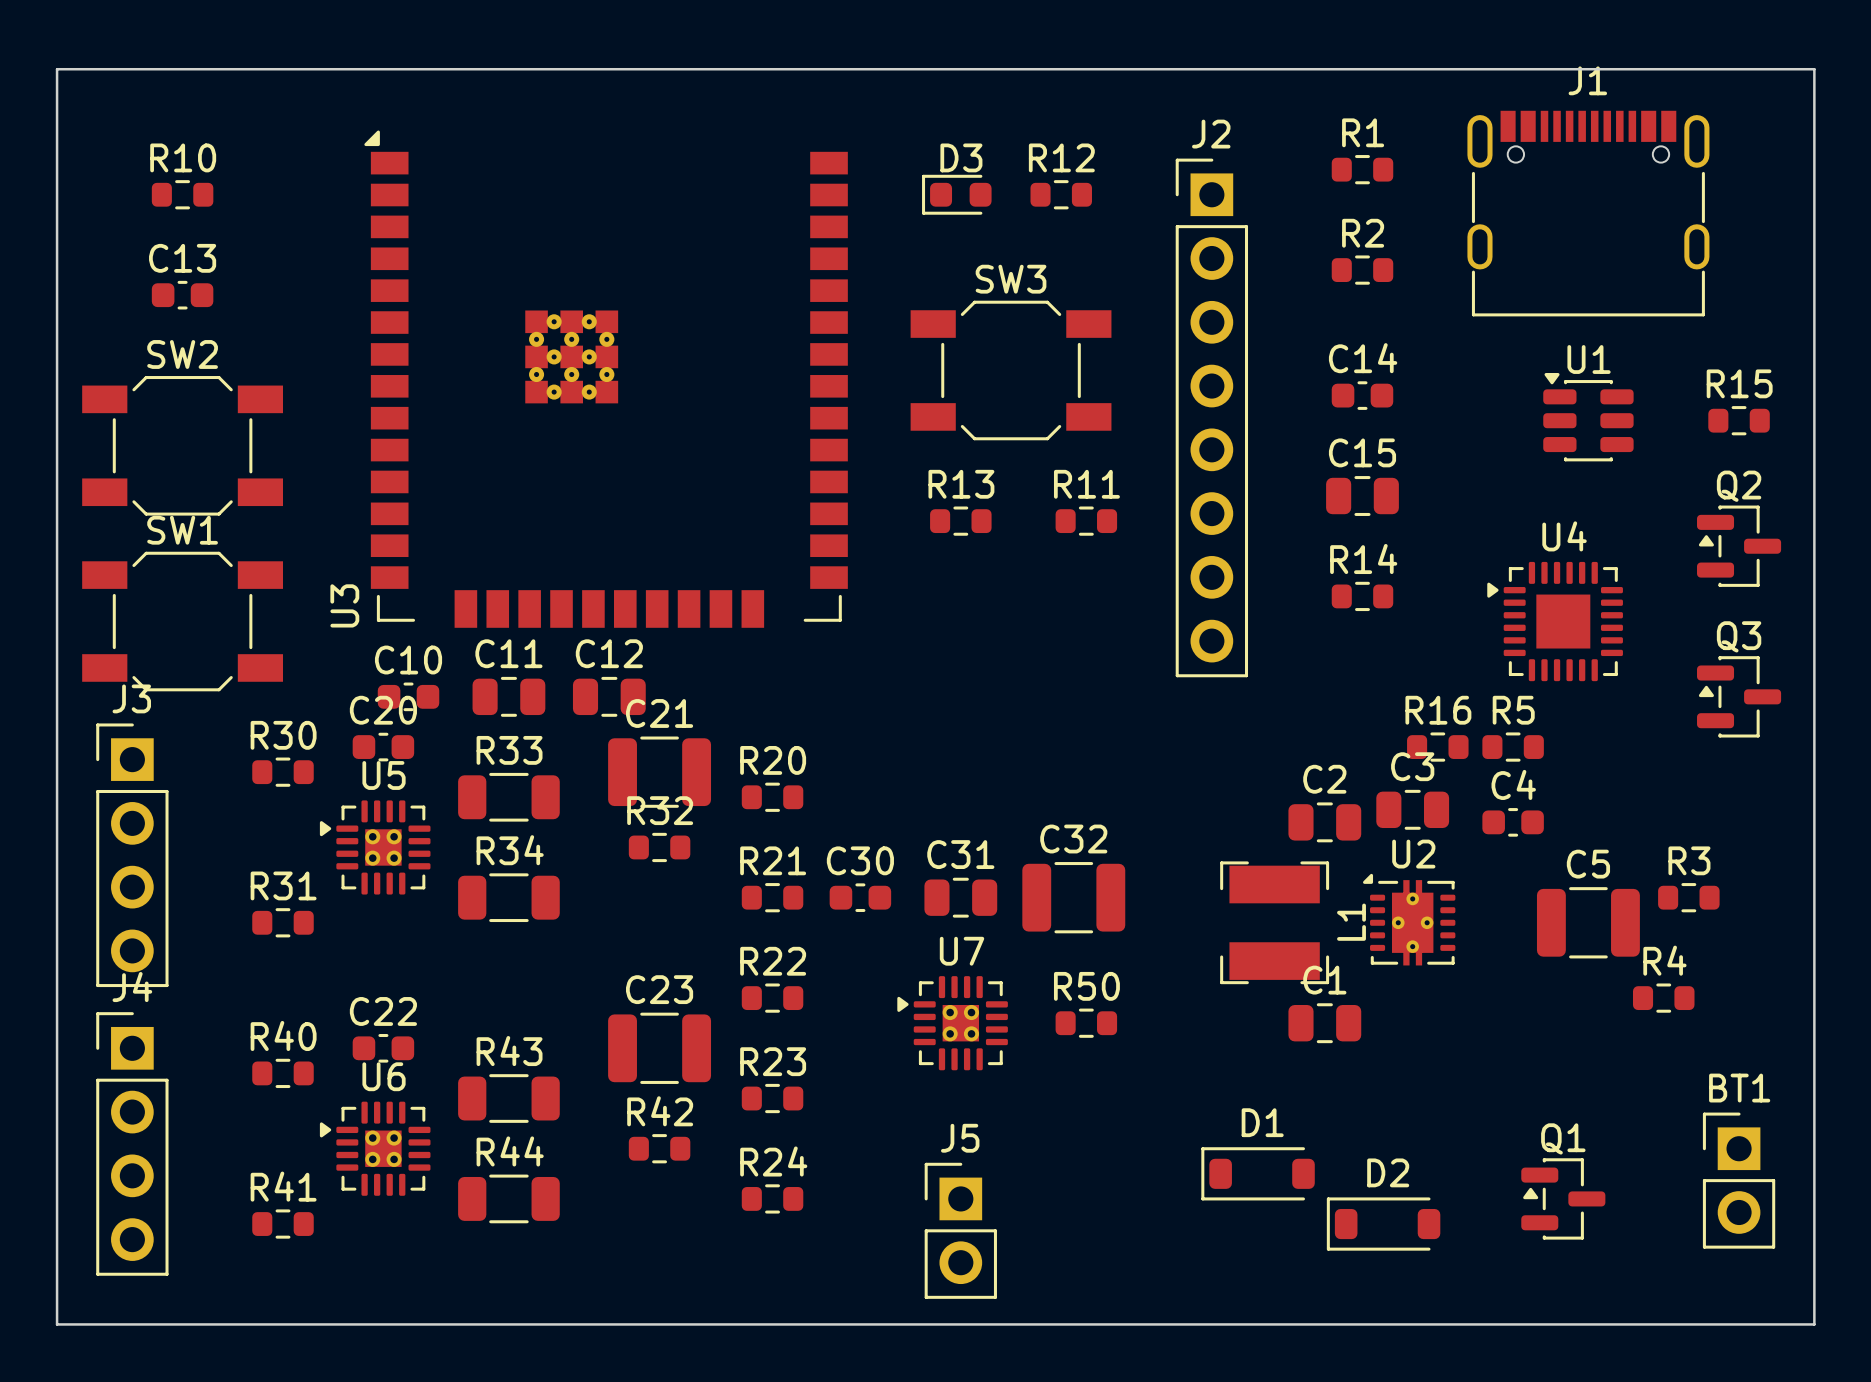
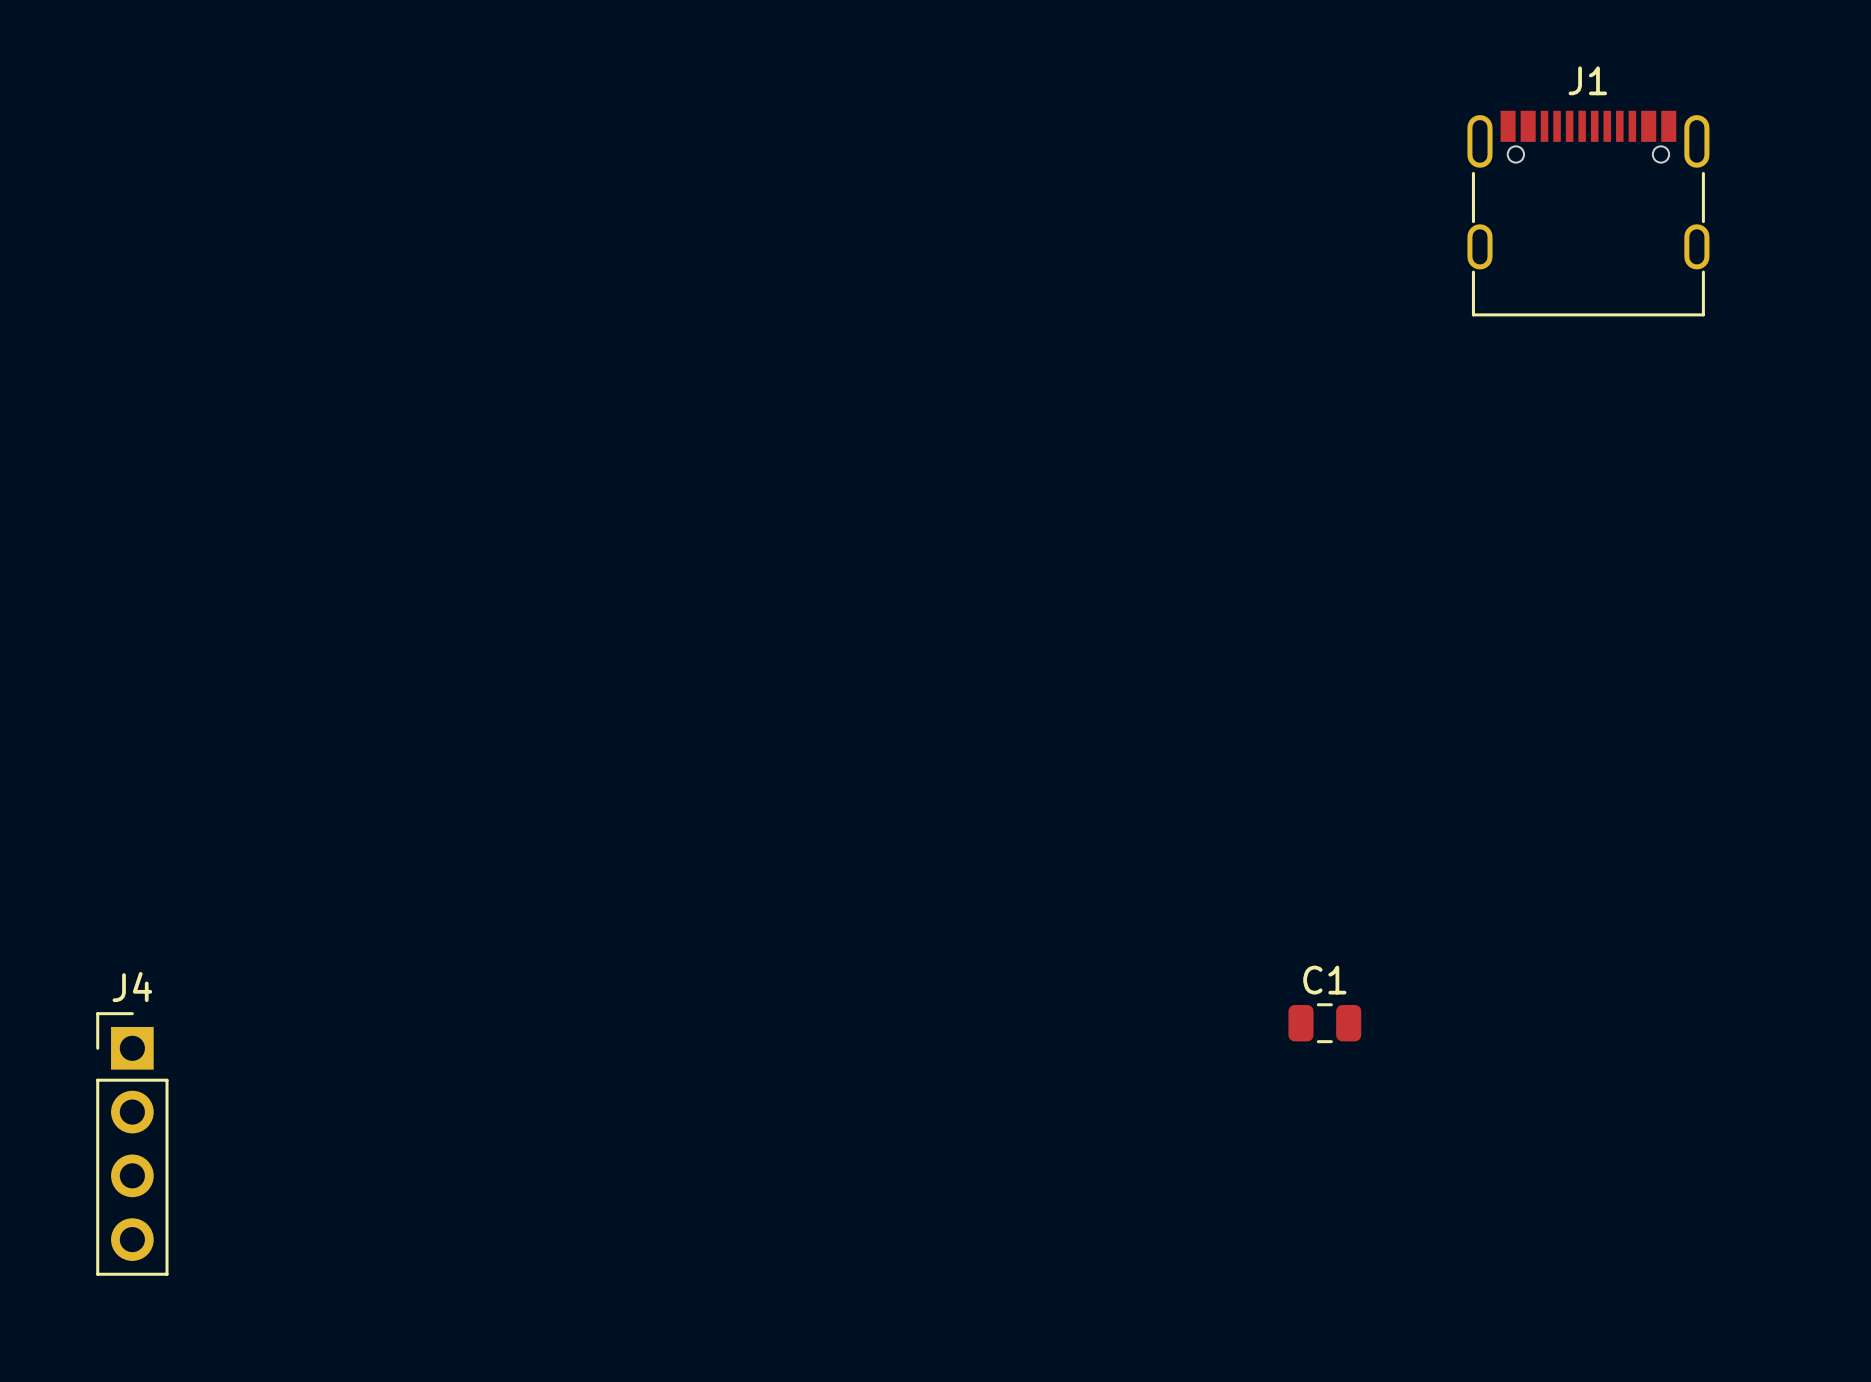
board edge: (57, 69) (1814, 69) (1814, 1324) (57, 1324) (57, 69) -> none
R1: (1362, 169) -> none
R10: (182, 194) -> none
D3: (956, 194) -> none
R12: (1061, 194) -> none
R2: (1362, 270) -> none
C13: (182, 295) -> none
SW3: (1011, 370) -> none
U3: (606, 379) -> none
C14: (1362, 395) -> none
J2: (1211, 417) -> none
U1: (1588, 417) -> none
R15: (1739, 420) -> none
SW2: (182, 445) -> none
C15: (1362, 496) -> none
R13: (960, 521) -> none
R11: (1086, 521) -> none
Q2: (1739, 546) -> none
R14: (1362, 596) -> none
SW1: (182, 621) -> none
U4: (1555, 621) -> none
C10: (408, 696) -> none
C11: (508, 696) -> none
C12: (609, 696) -> none
Q3: (1739, 696) -> none
C20: (383, 747) -> none
R16: (1437, 747) -> none
R5: (1513, 747) -> none
R30: (283, 772) -> none
C21: (659, 772) -> none
R33: (508, 797) -> none
R20: (772, 797) -> none
C3: (1412, 809) -> none
C2: (1324, 822) -> none
C4: (1513, 822) -> none
U5: (375, 847) -> none
R32: (659, 847) -> none
J3: (132, 855) -> none
R34: (508, 897) -> none
R21: (772, 897) -> none
C30: (860, 897) -> none
C31: (960, 897) -> none
C32: (1073, 897) -> none
R3: (1688, 897) -> none
U2: (1409, 919) -> none
R31: (283, 922) -> none
L1: (1274, 922) -> none
C5: (1588, 922) -> none
R22: (772, 998) -> none
R4: (1663, 998) -> none
U7: (952, 1023) -> none
R50: (1086, 1023) -> none
C22: (383, 1048) -> none
C23: (659, 1048) -> none
R40: (283, 1073) -> none
R43: (508, 1098) -> none
R23: (772, 1098) -> none
U6: (375, 1148) -> none
R42: (659, 1148) -> none
D1: (1258, 1173) -> none
BT1: (1739, 1180) -> none
R44: (508, 1198) -> none
R24: (772, 1198) -> none
Q1: (1563, 1198) -> none
R41: (283, 1224) -> none
D2: (1383, 1224) -> none
J5: (960, 1230) -> none

